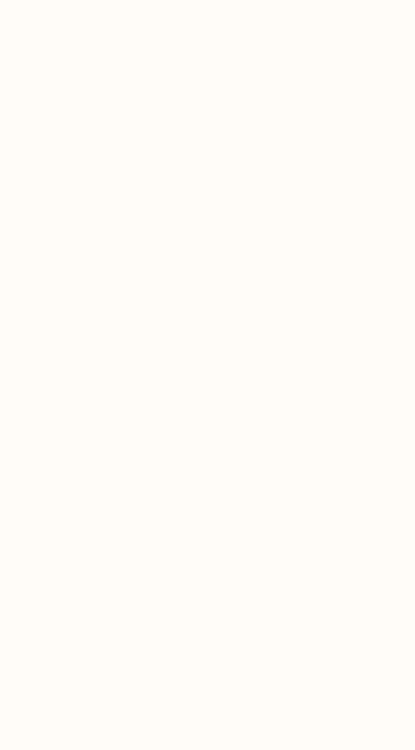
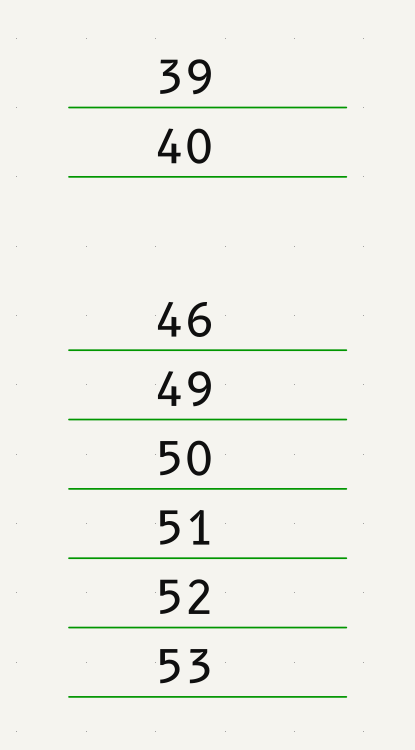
label: none -> 39 (185, 76)
wire: none -> (68, 107) (346, 107)
label: none -> 40 (184, 146)
wire: none -> (68, 176) (346, 176)
label: none -> 46 (184, 319)
wire: none -> (68, 350) (346, 350)
label: none -> 49 (184, 388)
wire: none -> (68, 419) (346, 419)
label: none -> 50 (185, 458)
wire: none -> (68, 488) (346, 488)
label: none -> 51 (184, 527)
wire: none -> (68, 558) (346, 558)
label: none -> 52 (184, 596)
wire: none -> (68, 627) (346, 627)
label: none -> 53 (184, 666)
wire: none -> (68, 696) (346, 696)

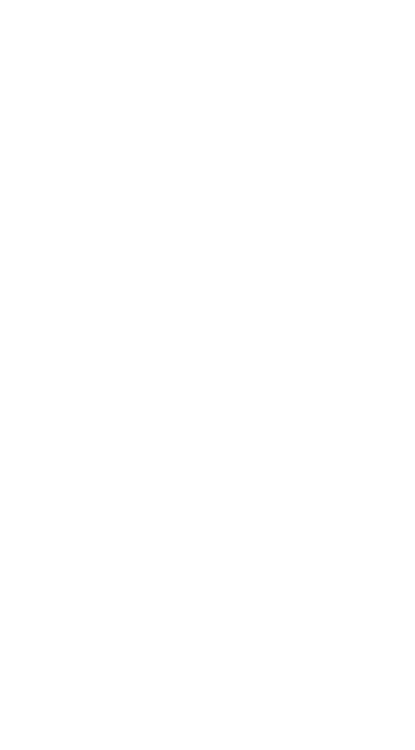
label: 39 (185, 76) -> none
wire: (68, 107) (346, 107) -> none
label: 40 (184, 146) -> none
wire: (68, 176) (346, 176) -> none
label: 46 (184, 319) -> none
wire: (68, 350) (346, 350) -> none
label: 49 (184, 388) -> none
wire: (68, 419) (346, 419) -> none
label: 50 (185, 458) -> none
wire: (68, 488) (346, 488) -> none
label: 51 (184, 527) -> none
wire: (68, 558) (346, 558) -> none
label: 52 (184, 596) -> none
wire: (68, 627) (346, 627) -> none
label: 53 (184, 666) -> none
wire: (68, 696) (346, 696) -> none

